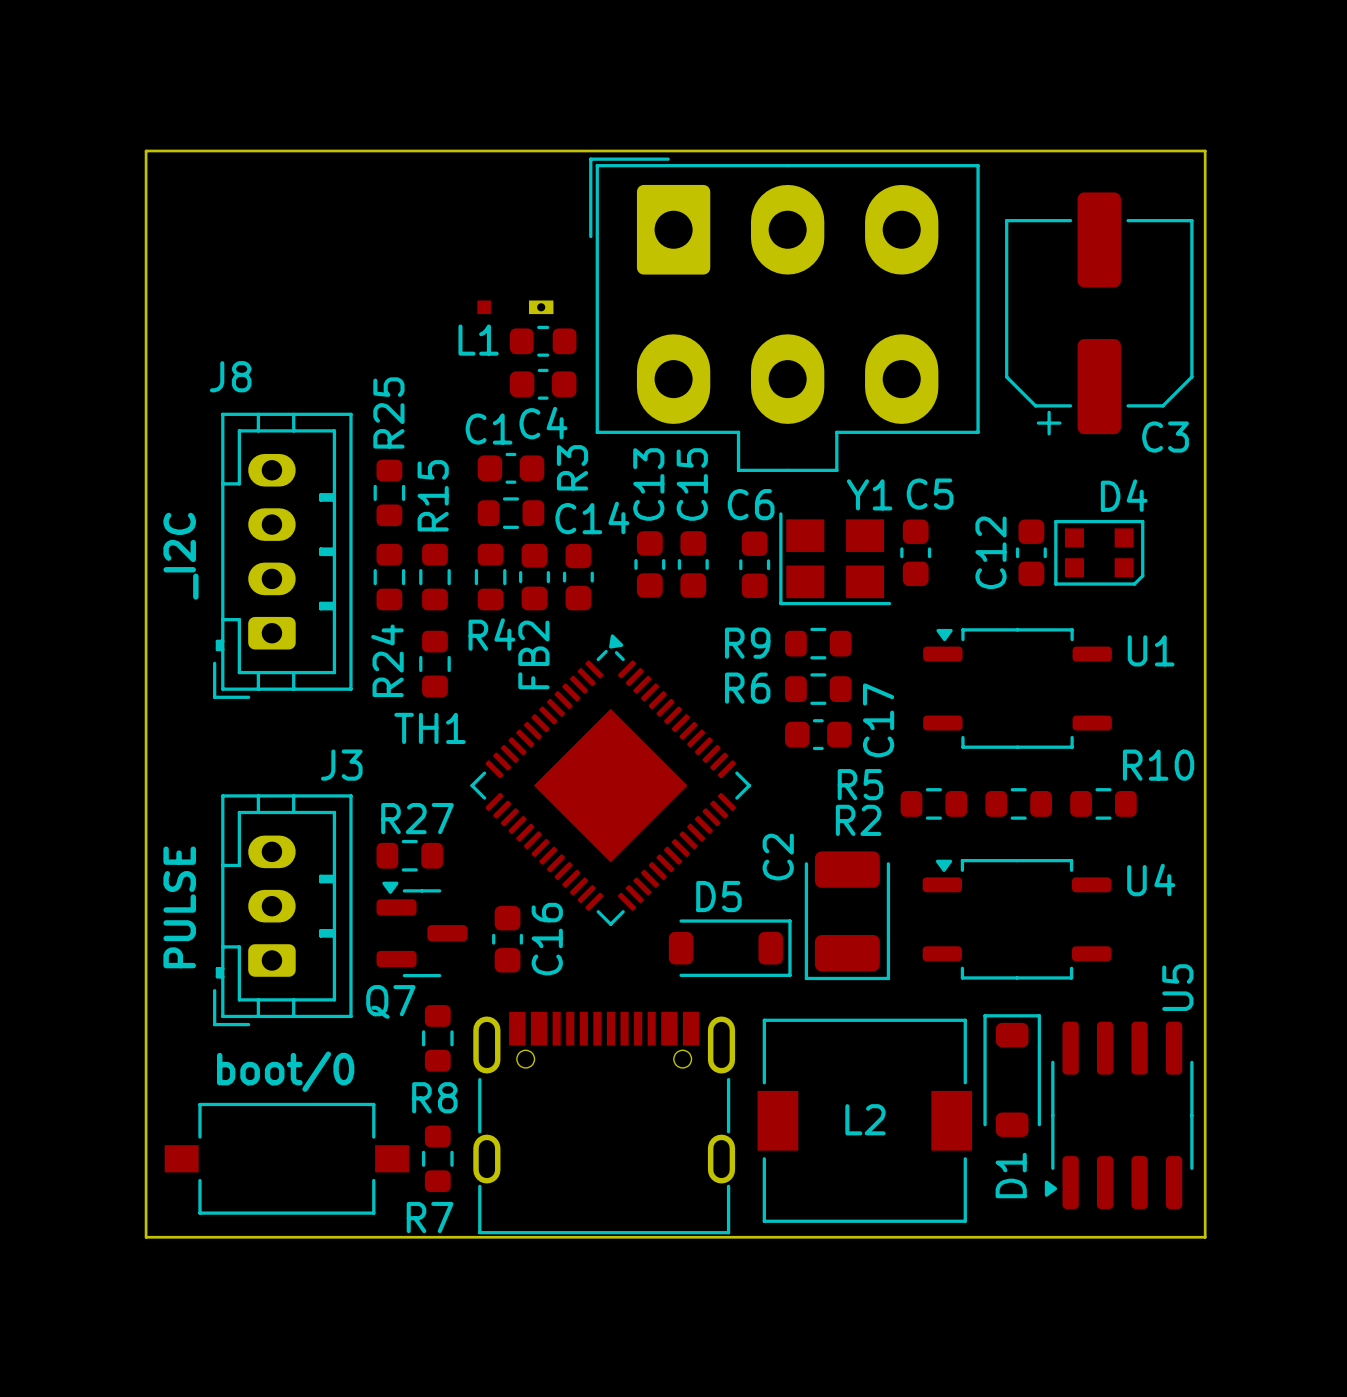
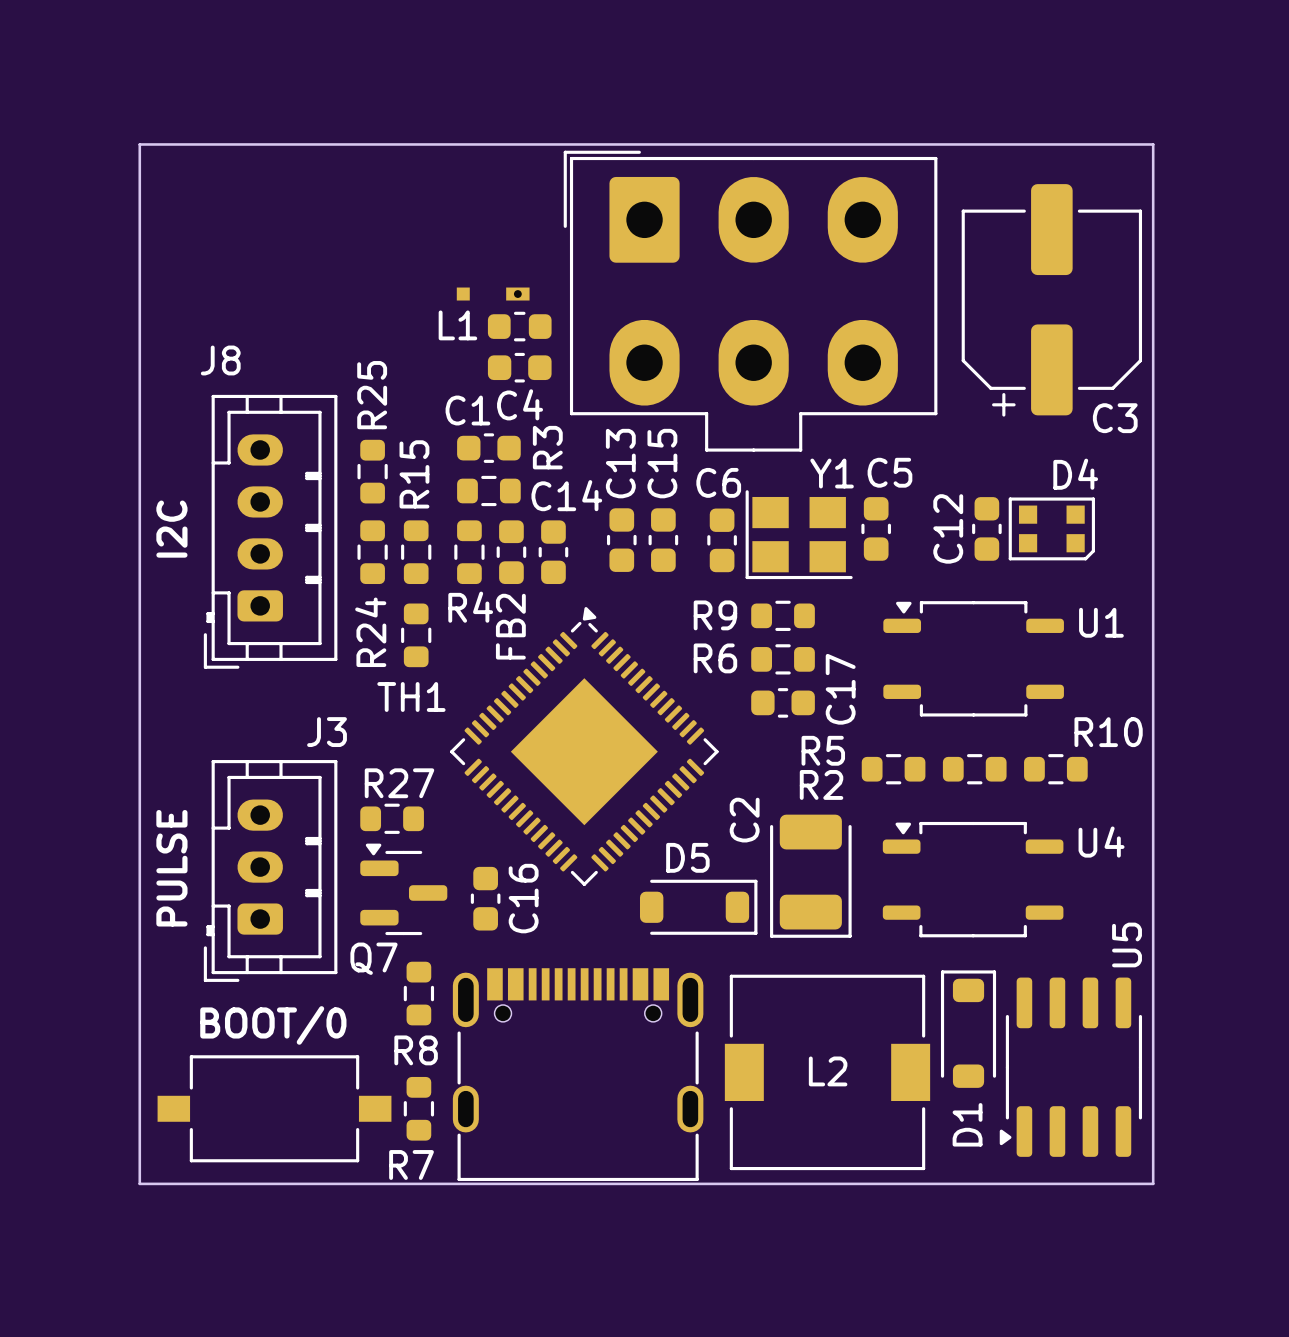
text: _I2C (180, 556) -> I2C (171, 529)
text: boot/0 (285, 1071) -> BOOT/0 (273, 1025)

